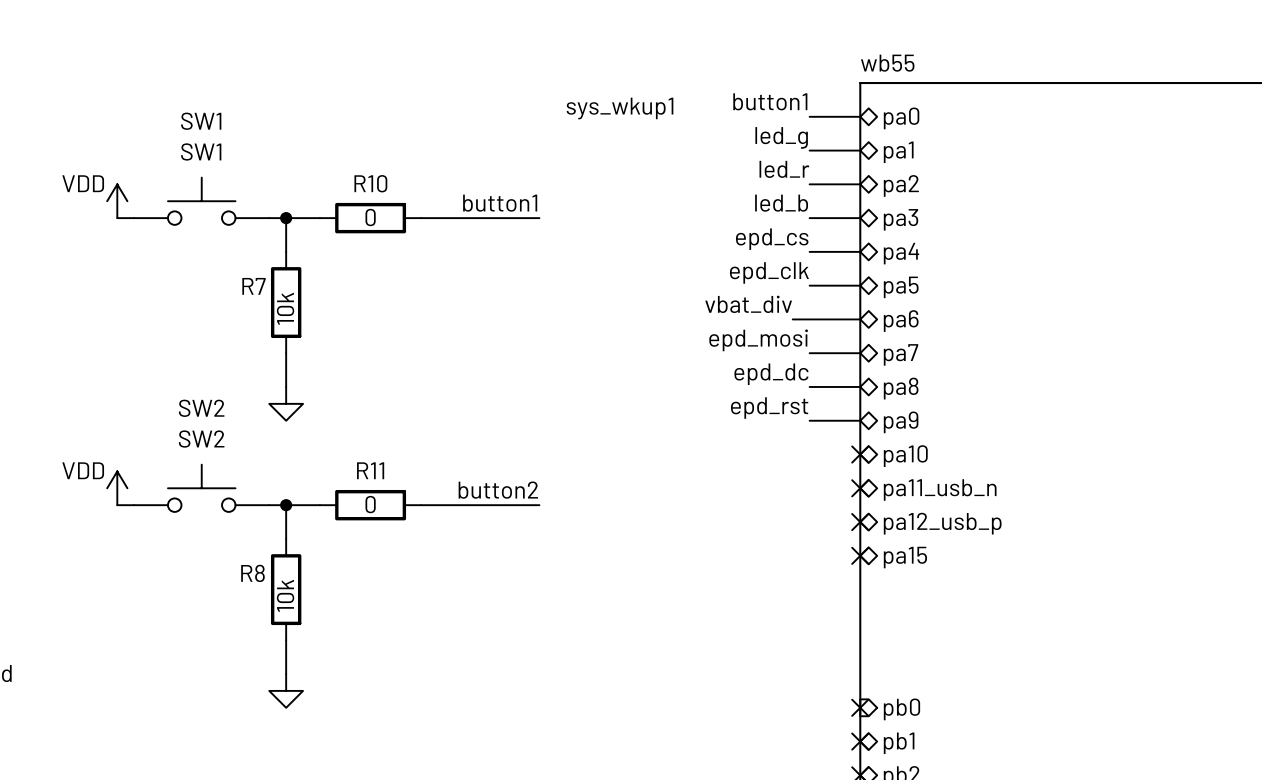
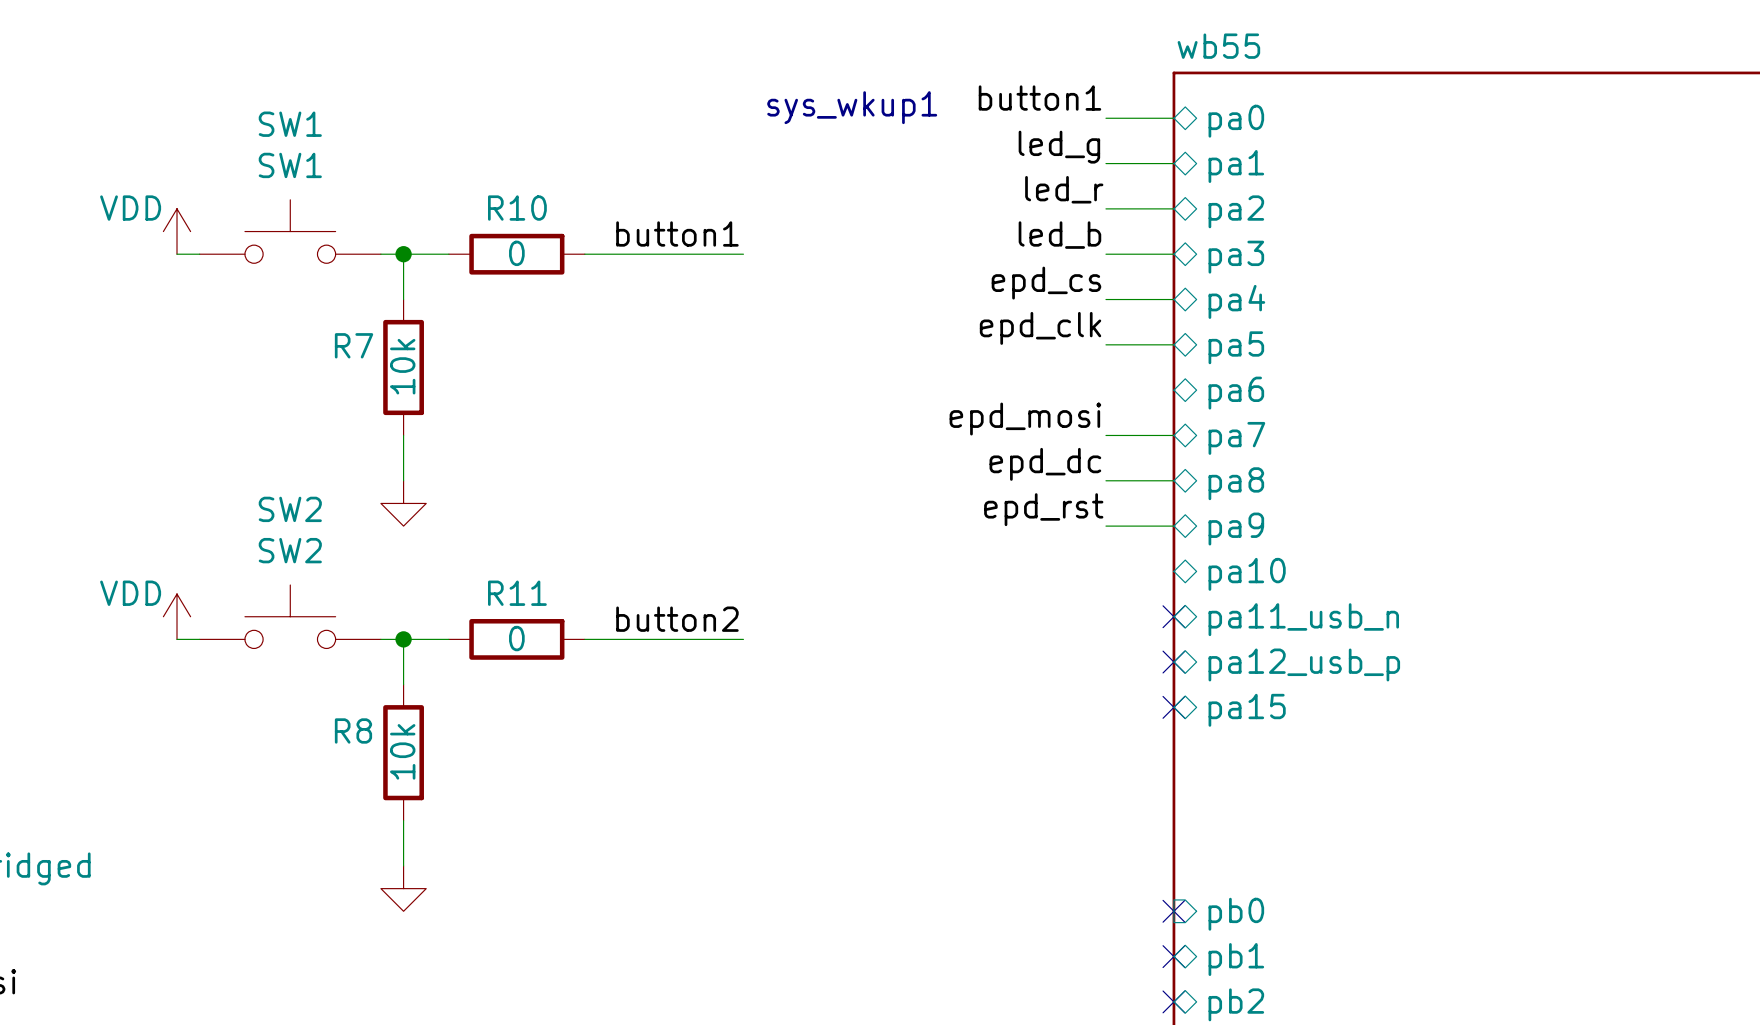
label: vbat_div (748, 304) -> none
wire: (792, 319) (860, 319) -> none
no-connect mark: (860, 454) -> none

